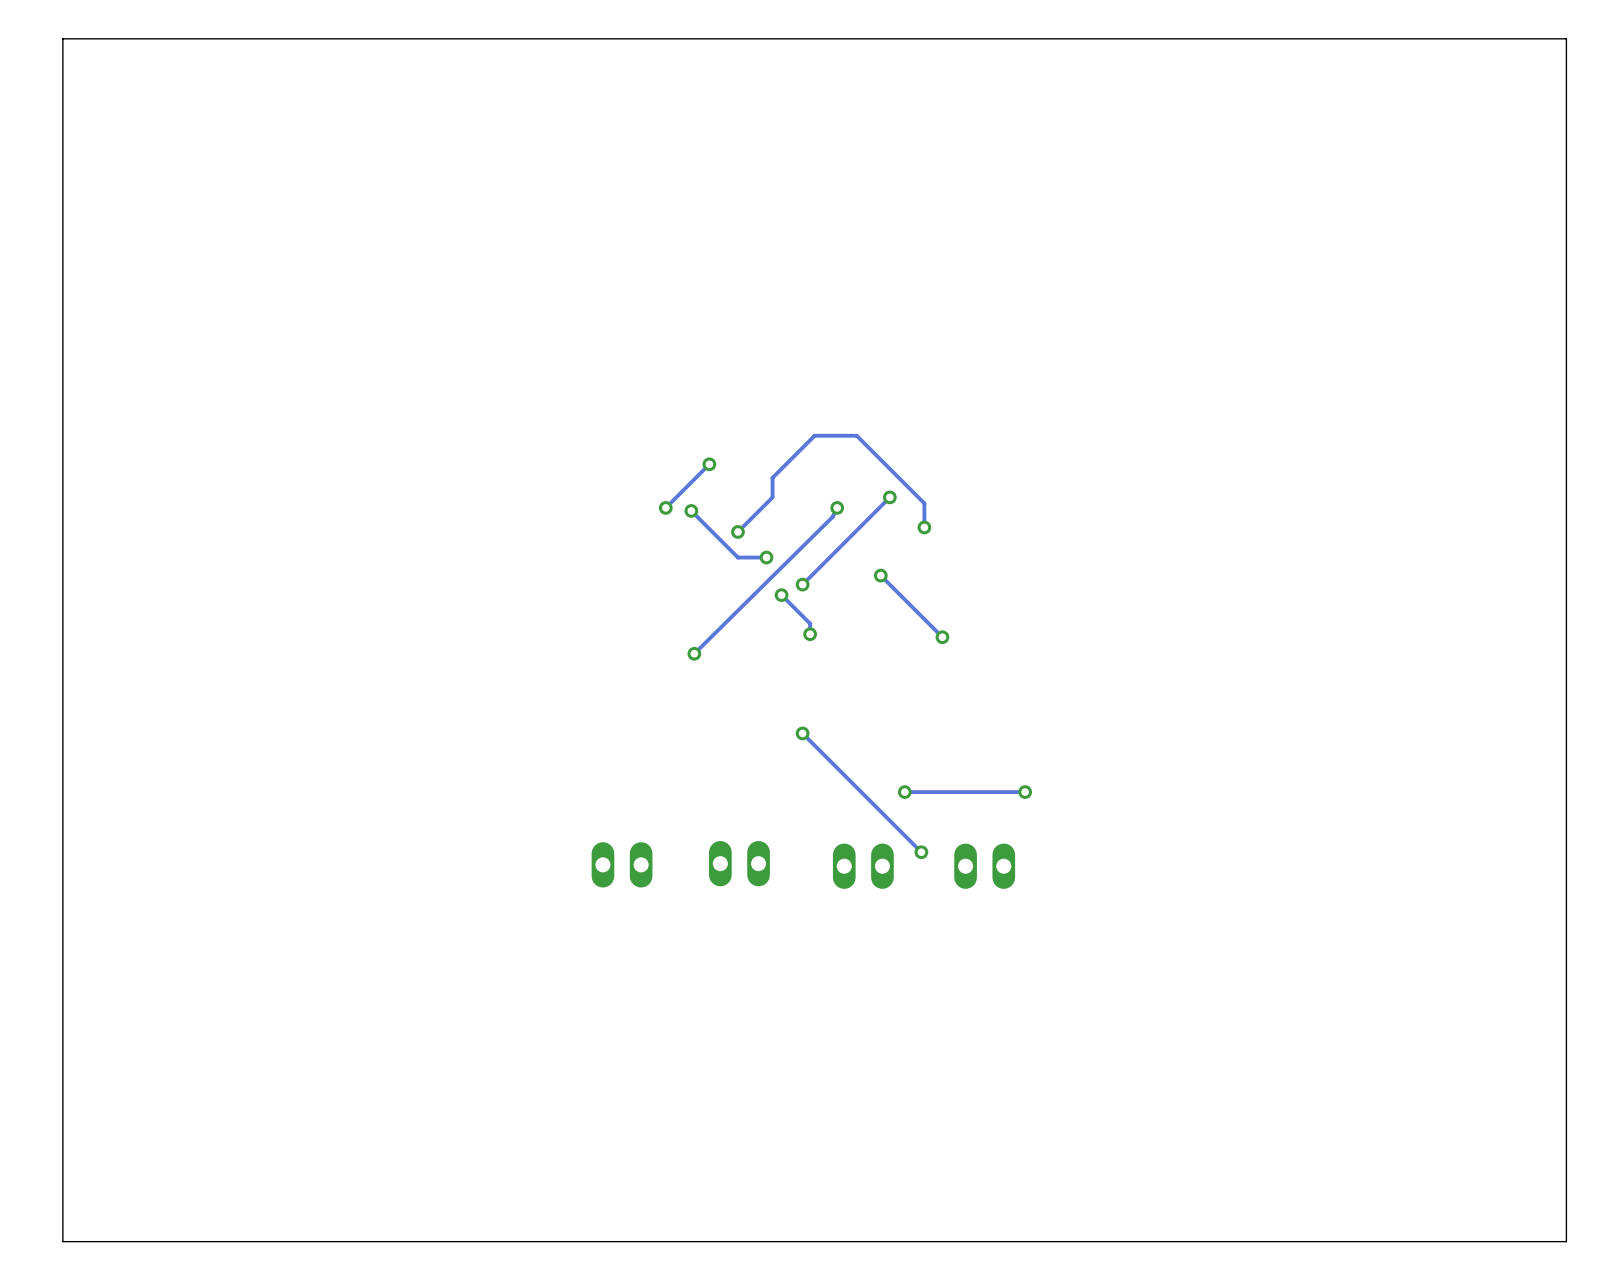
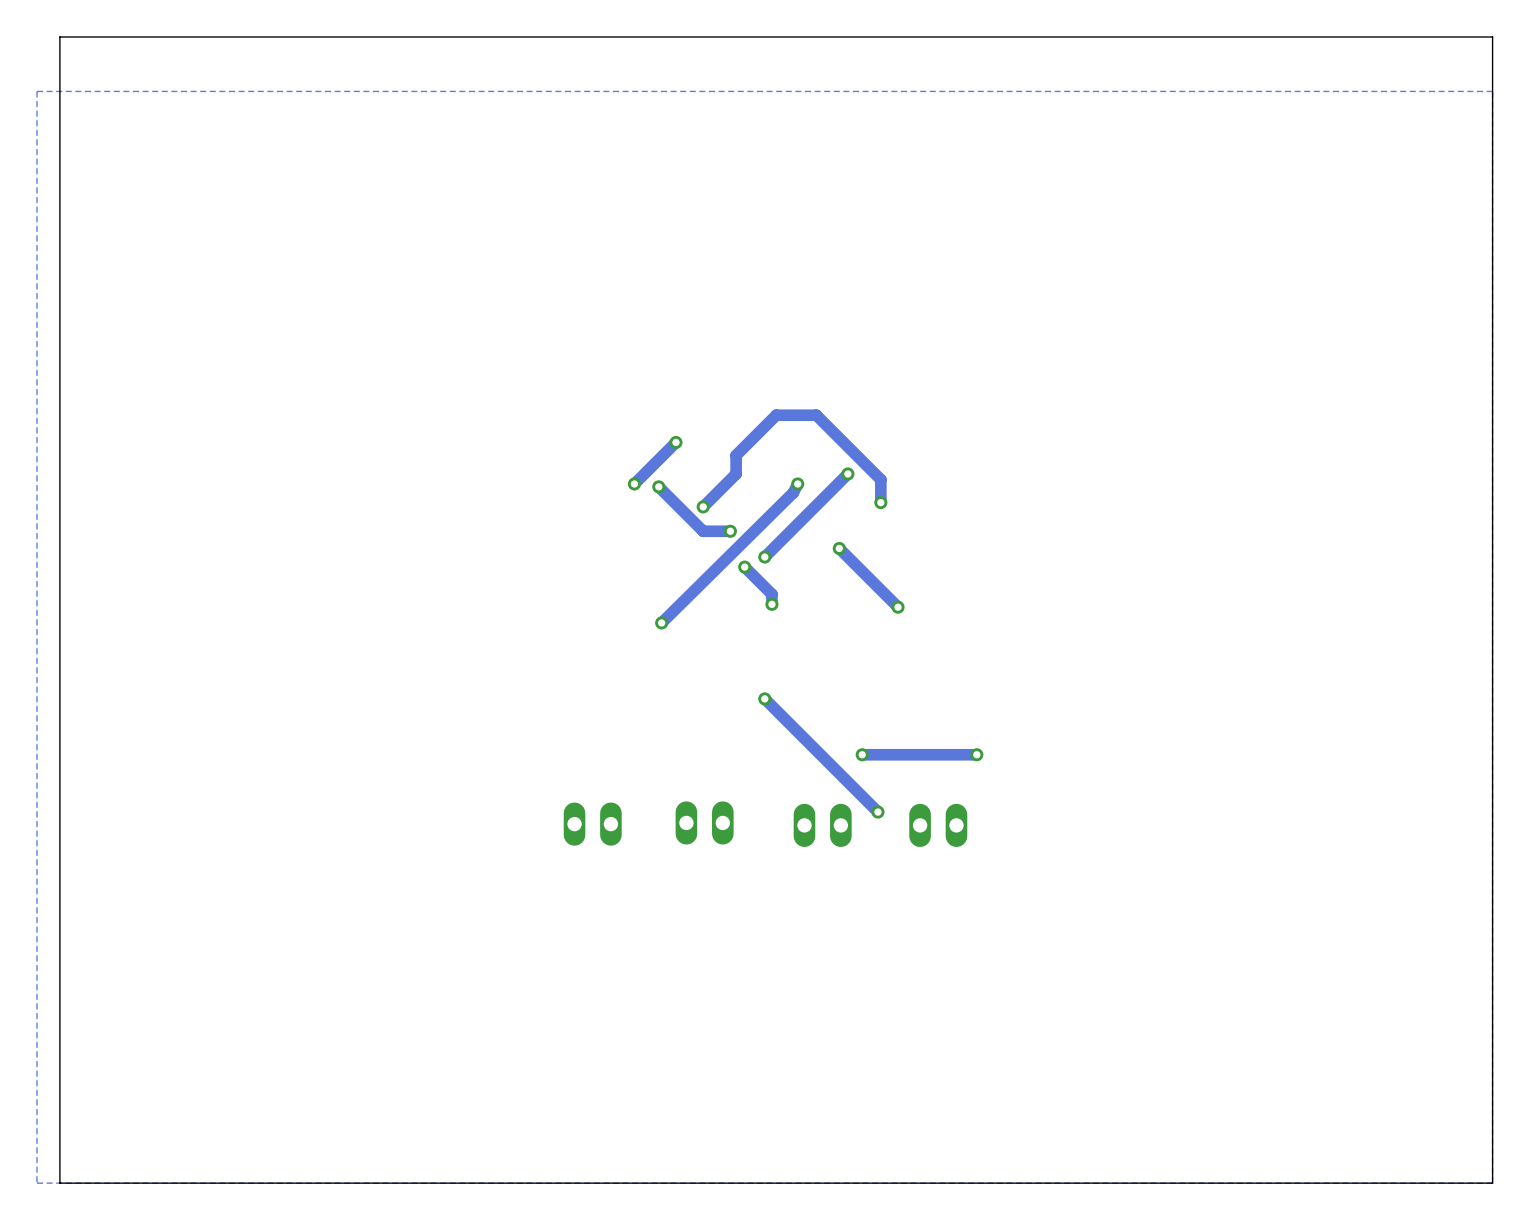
zone outline: none -> (1492, 91) (36, 91) (36, 1183) (1492, 1183) (1492, 91)
track width: thin (709, 464) (665, 507) -> thick (675, 442) (634, 483)
track width: thin (889, 497) (802, 584) -> thick (847, 473) (764, 557)
track width: thin (837, 507) (832, 516) (694, 653) -> thick (797, 483) (793, 492) (661, 622)
track width: thin (691, 510) (737, 557) (766, 557) -> thick (658, 486) (703, 531) (730, 531)
track width: thin (924, 527) (924, 503) (856, 435) (814, 435) (772, 477) (772, 497) (737, 531) -> thick (880, 502) (880, 479) (816, 415) (776, 415) (736, 455) (736, 473) (703, 506)
track width: thin (880, 575) (942, 637) -> thick (839, 548) (898, 607)
track width: thin (781, 595) (810, 623) (810, 634) -> thick (744, 567) (771, 594) (771, 604)
track width: thin (802, 733) (921, 852) -> thick (764, 698) (877, 812)
track width: thin (1025, 792) (904, 792) -> thick (976, 754) (862, 754)

